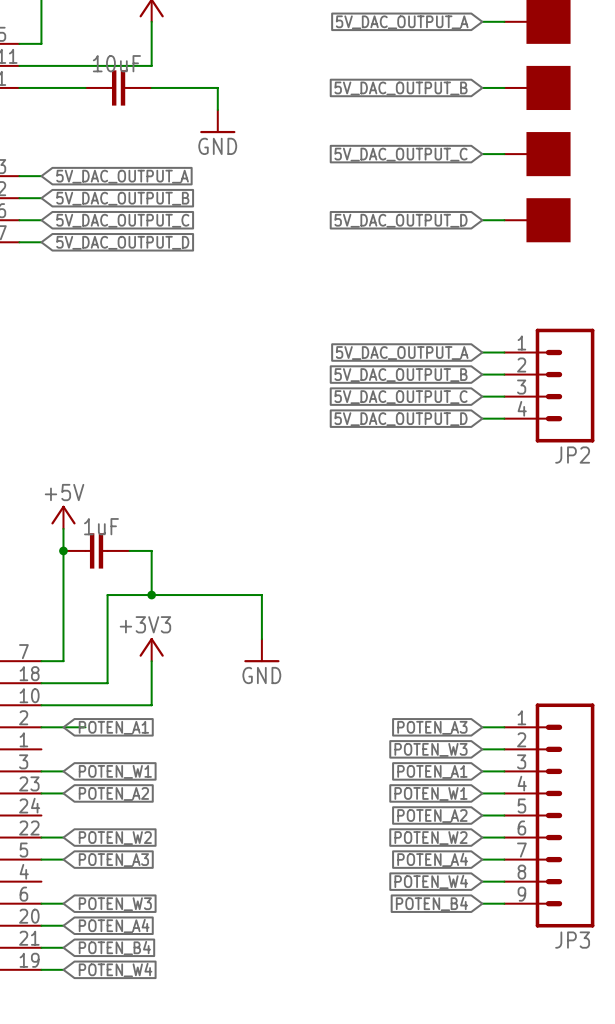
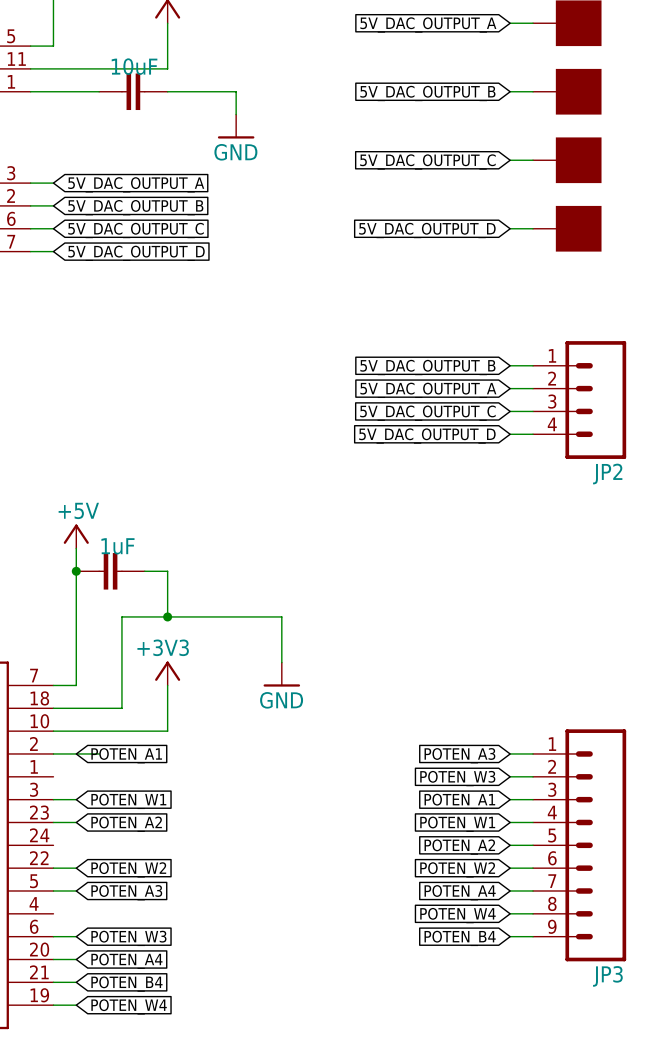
global label: 5V_DAC_OUTPUT_A (402, 353) -> 5V_DAC_OUTPUT_B (427, 367)
global label: 5V_DAC_OUTPUT_B (401, 375) -> 5V_DAC_OUTPUT_A (428, 390)

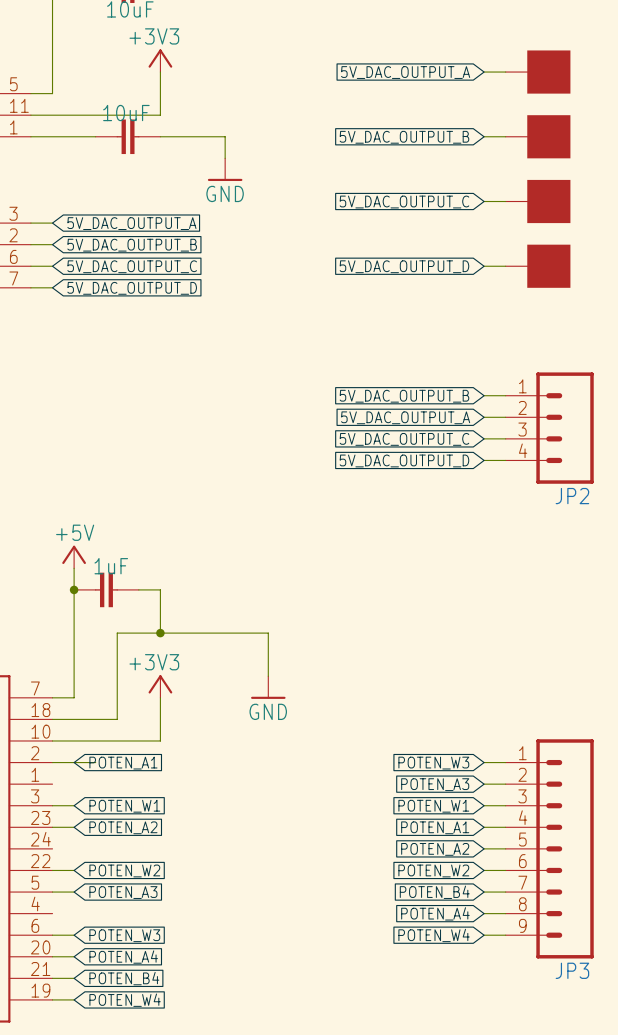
global label: POTEN_A3 (459, 755) -> POTEN_W3 (433, 763)
global label: POTEN_W3 (457, 778) -> POTEN_A3 (435, 784)
global label: POTEN_A1 (459, 801) -> POTEN_W1 (433, 806)
global label: POTEN_W1 (457, 824) -> POTEN_A1 (435, 827)
global label: POTEN_A4 (460, 892) -> POTEN_B4 (434, 892)
global label: POTEN_W4 (457, 915) -> POTEN_A4 (435, 913)
global label: POTEN_B4 (460, 938) -> POTEN_W4 (434, 935)

